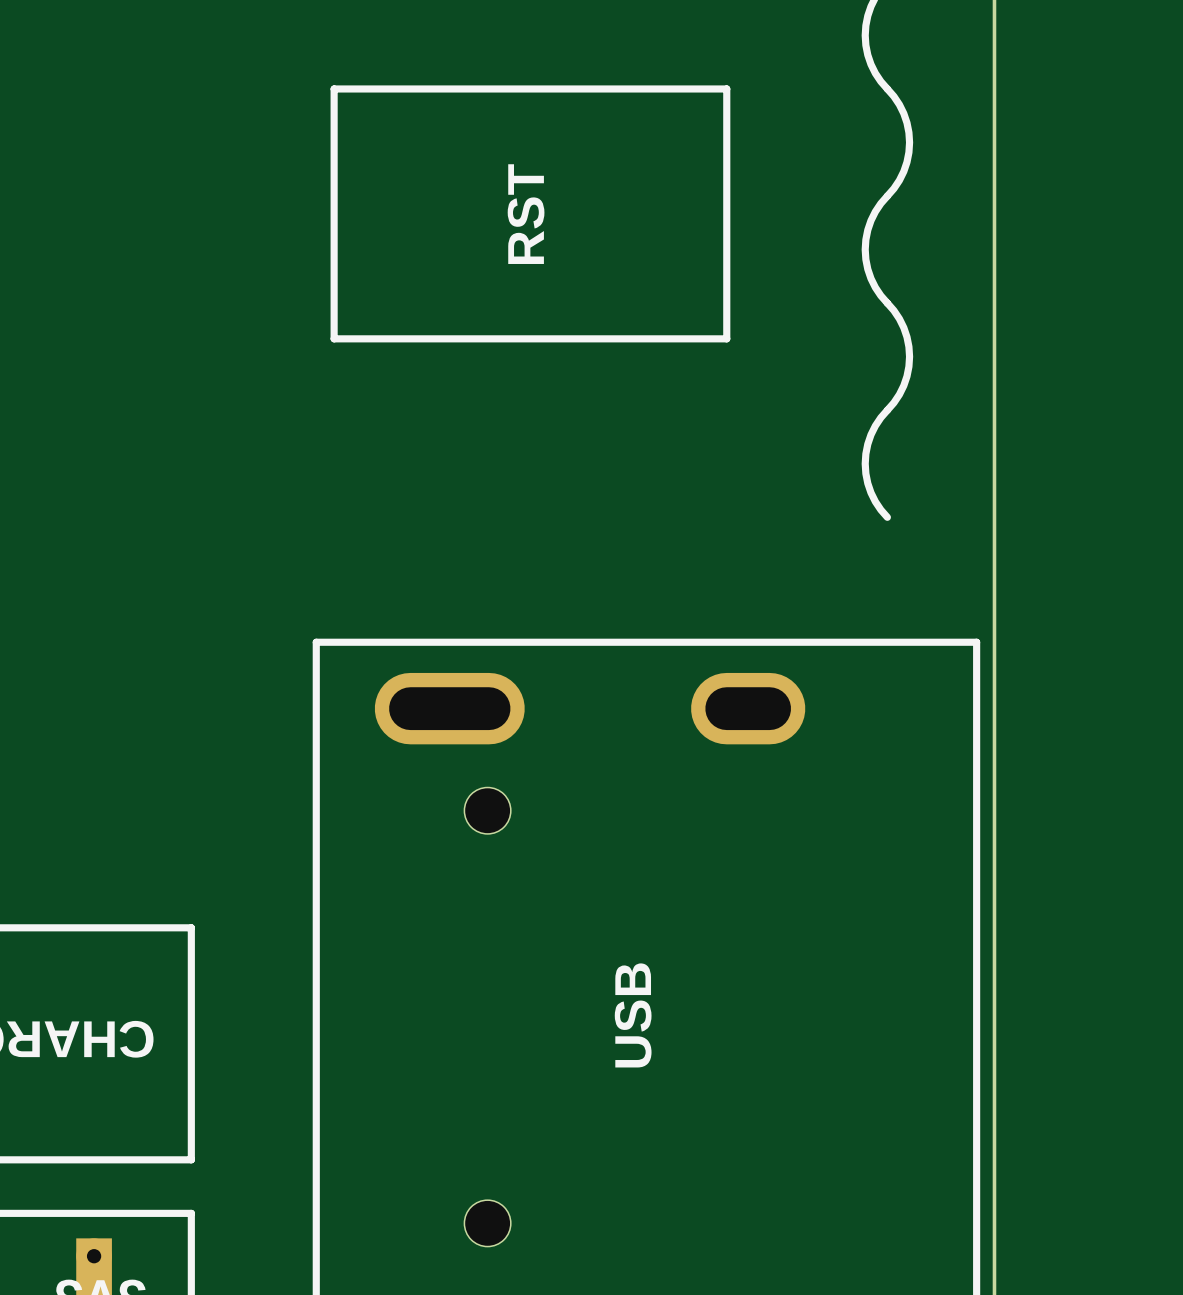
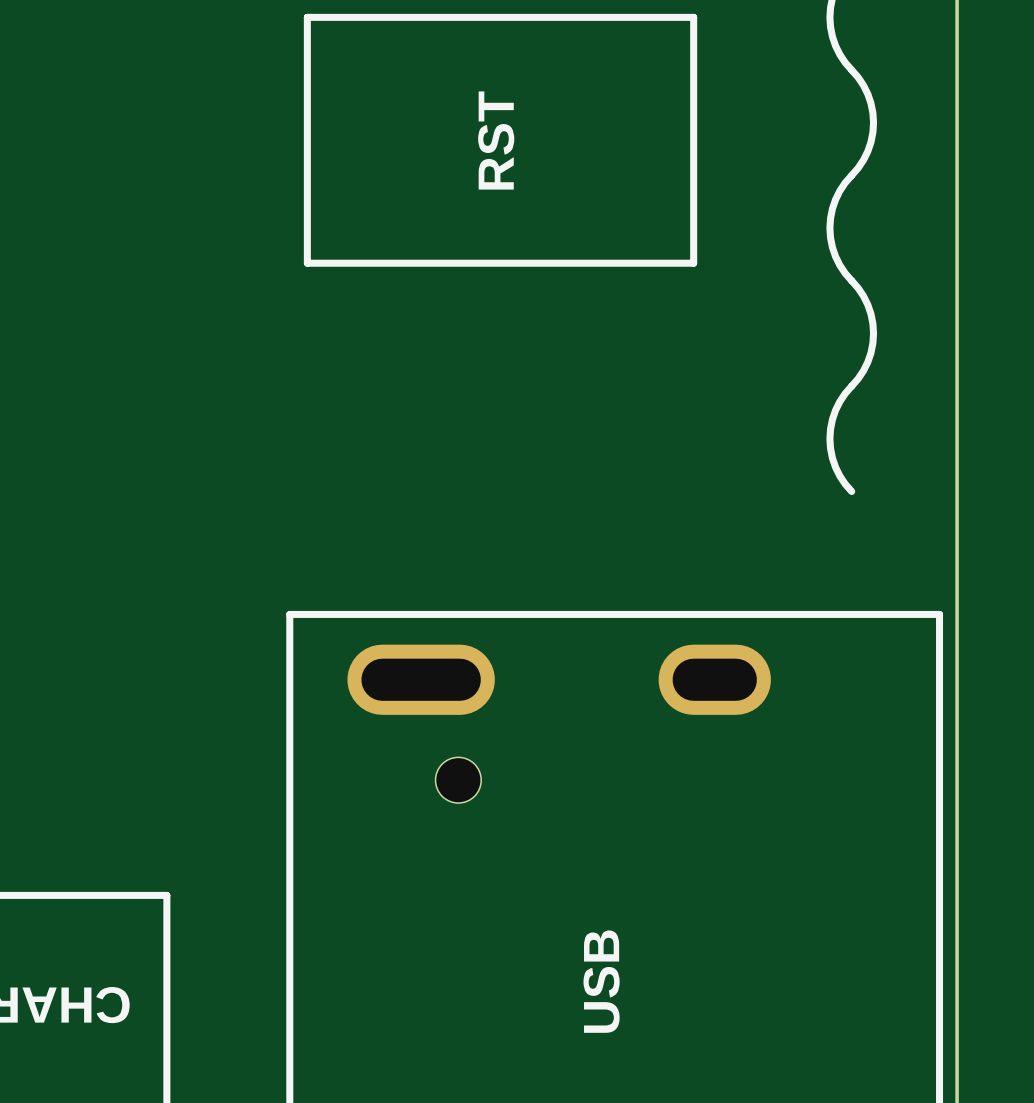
line: (726, 88) (334, 88) -> (693, 70) (693, 17) (307, 17) (307, 70)
text position: RST (526, 214) -> RST (496, 140)
line: (726, 285) (726, 338) (334, 338) (334, 285) -> (693, 263) (307, 263)

